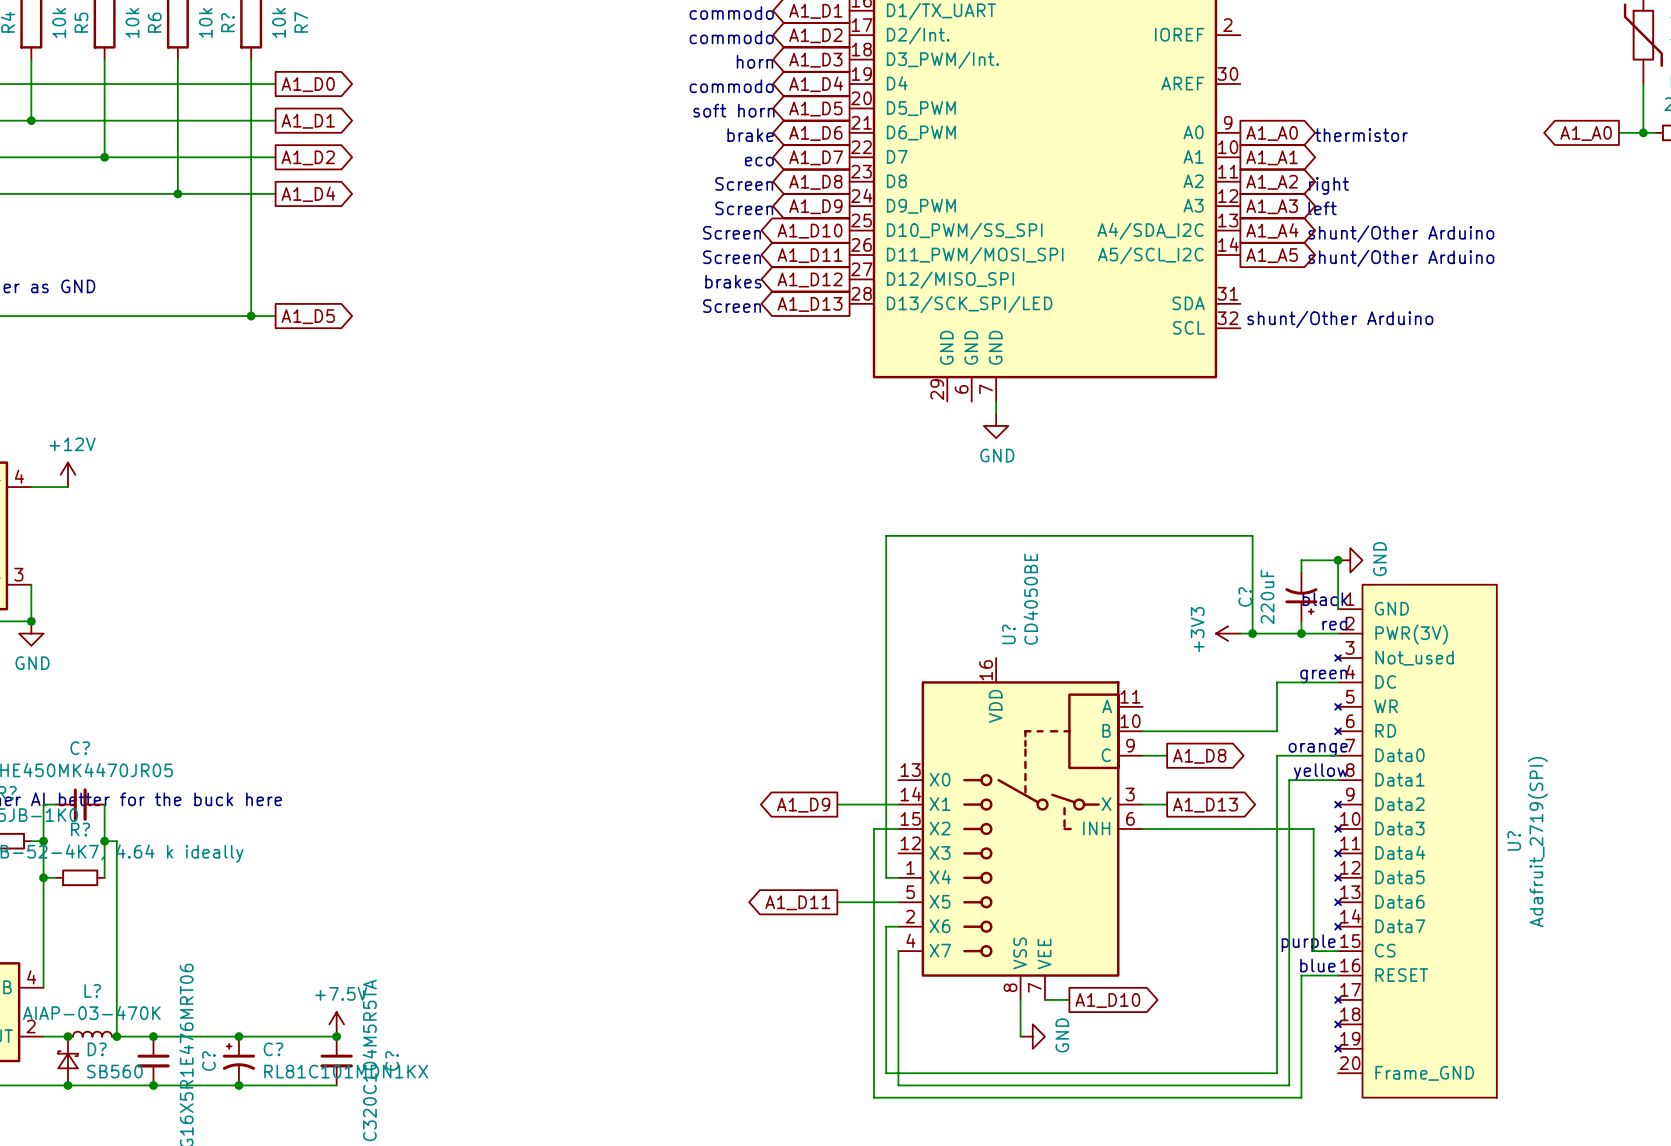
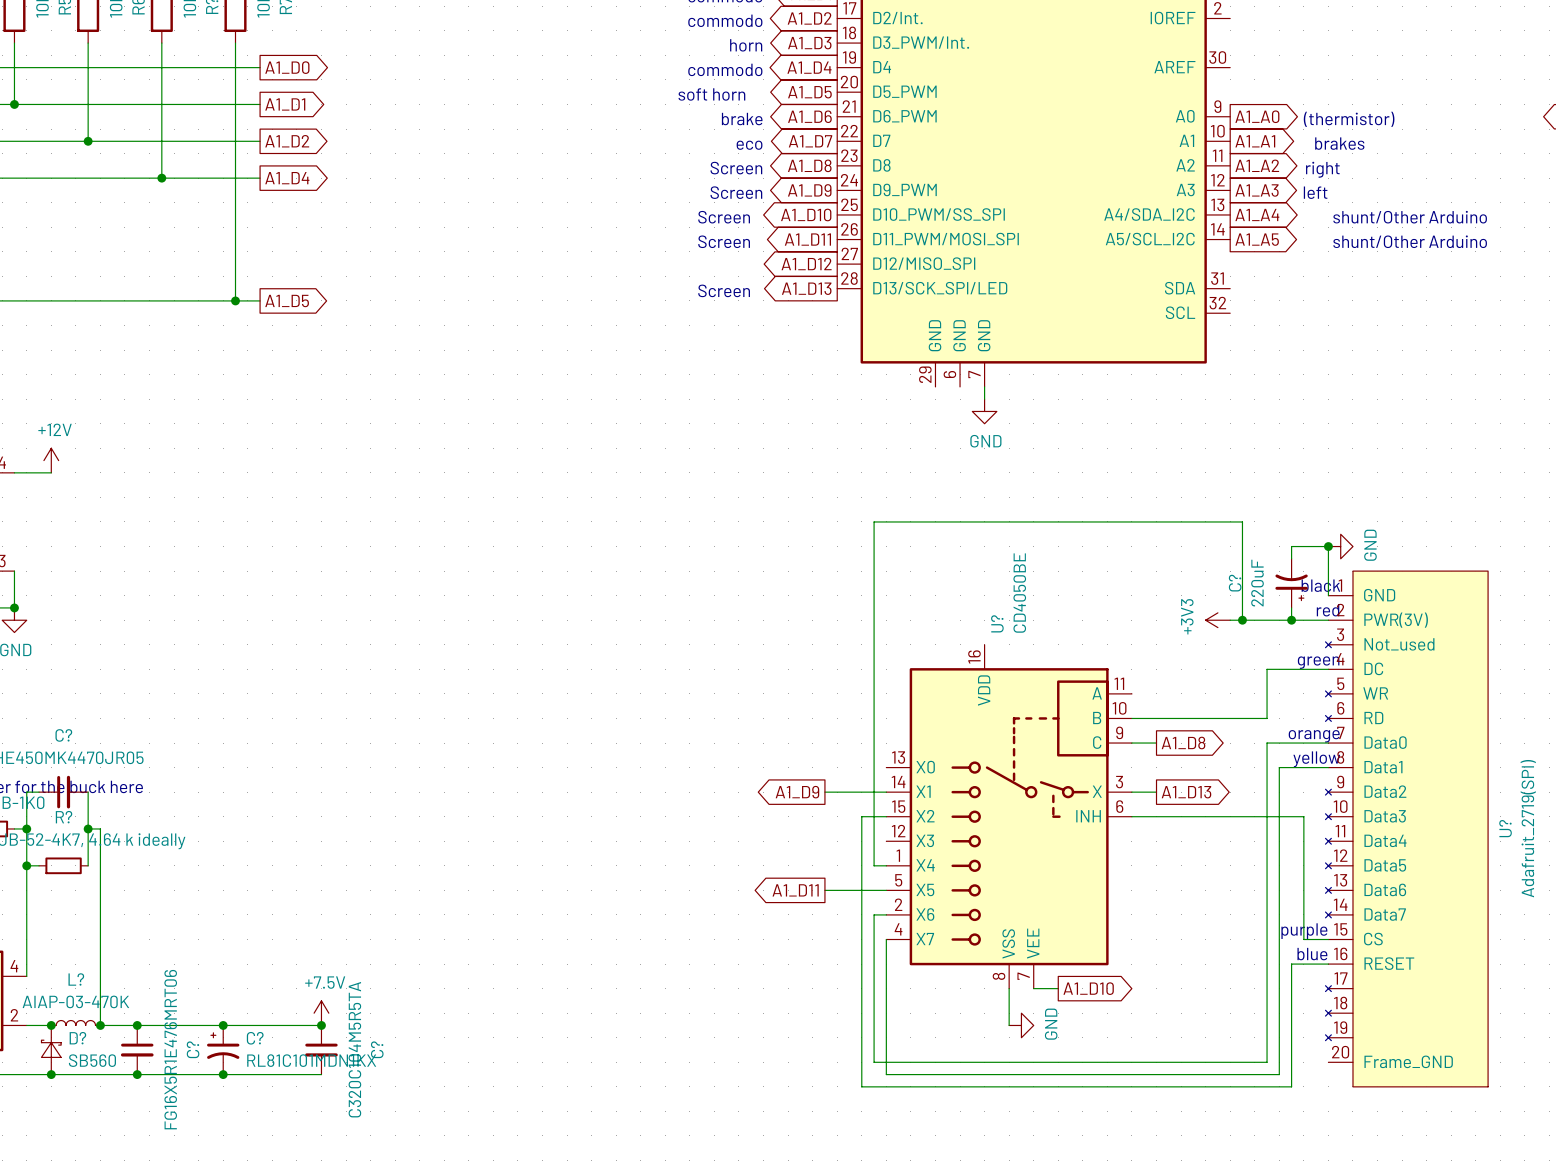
text: thermistor (1361, 135) -> (thermistor) (1349, 119)
text: none -> brakes (1339, 143)
text: brakes (733, 281) -> none
text: shunt/Other Arduino (1340, 319) -> none

